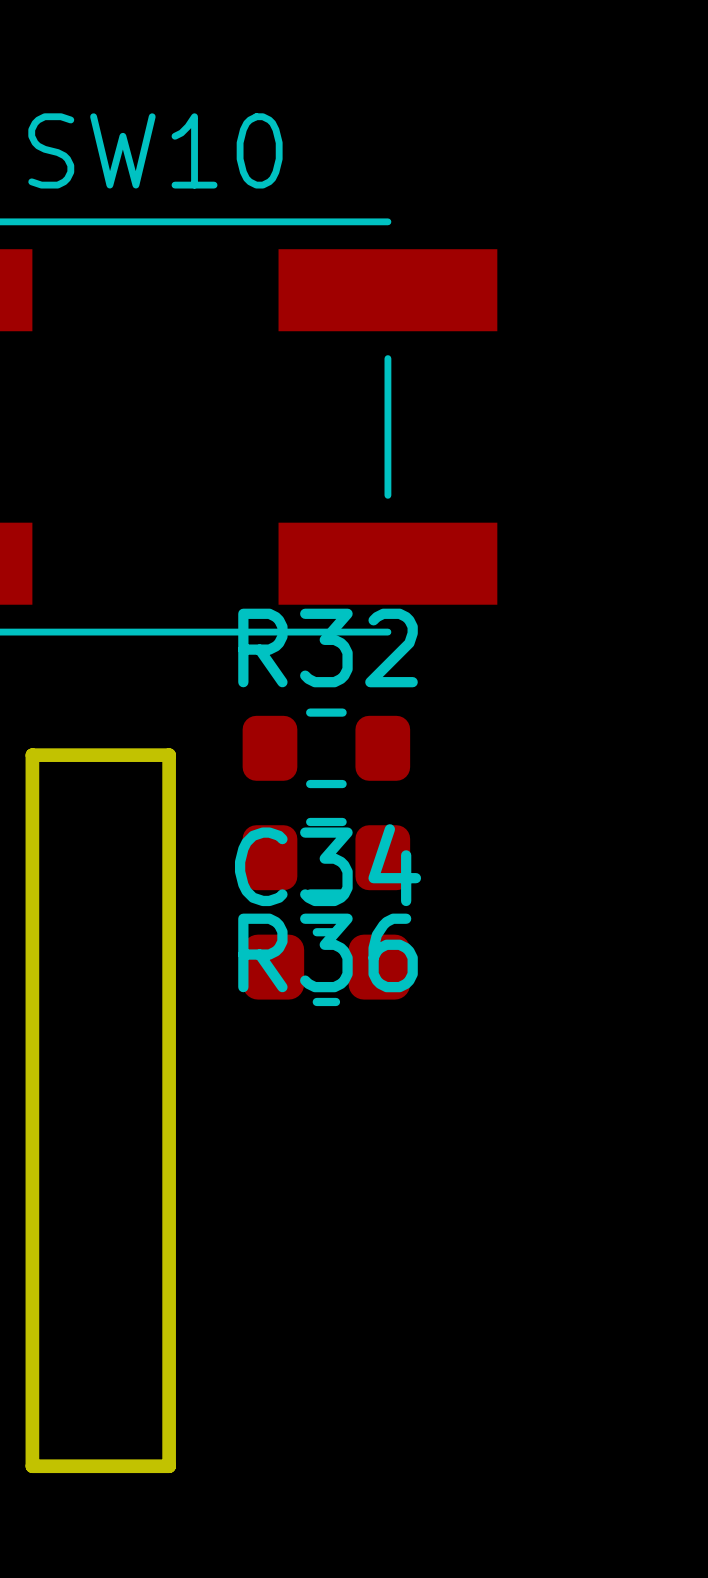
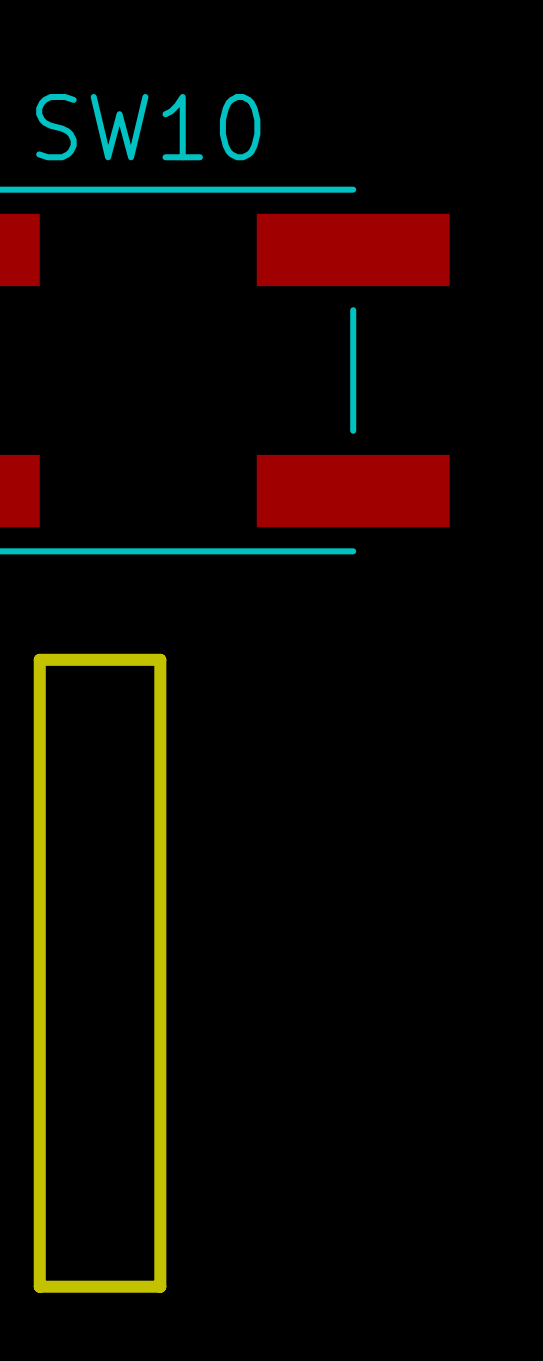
R32: (326, 748) -> none
R36: (326, 857) -> none
C34: (326, 967) -> none

